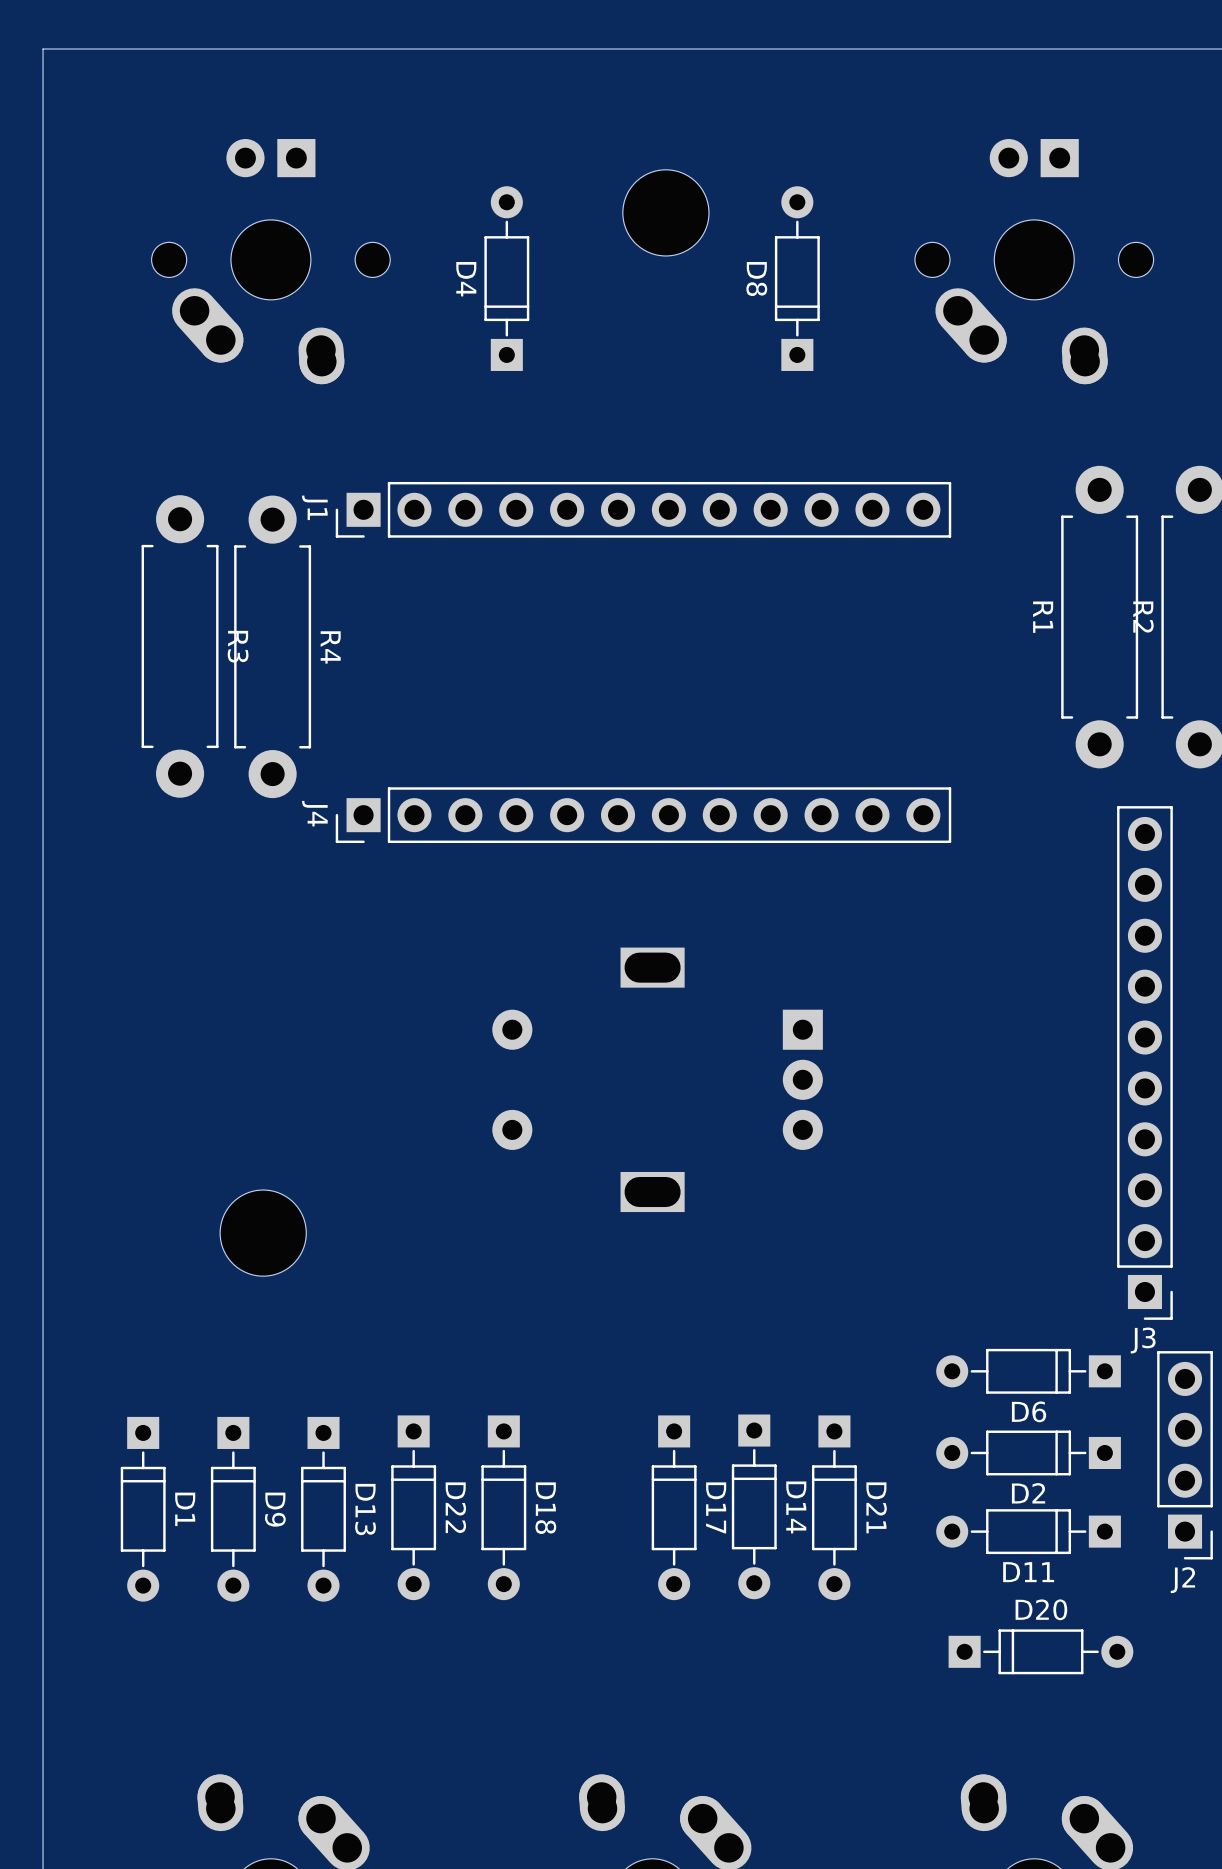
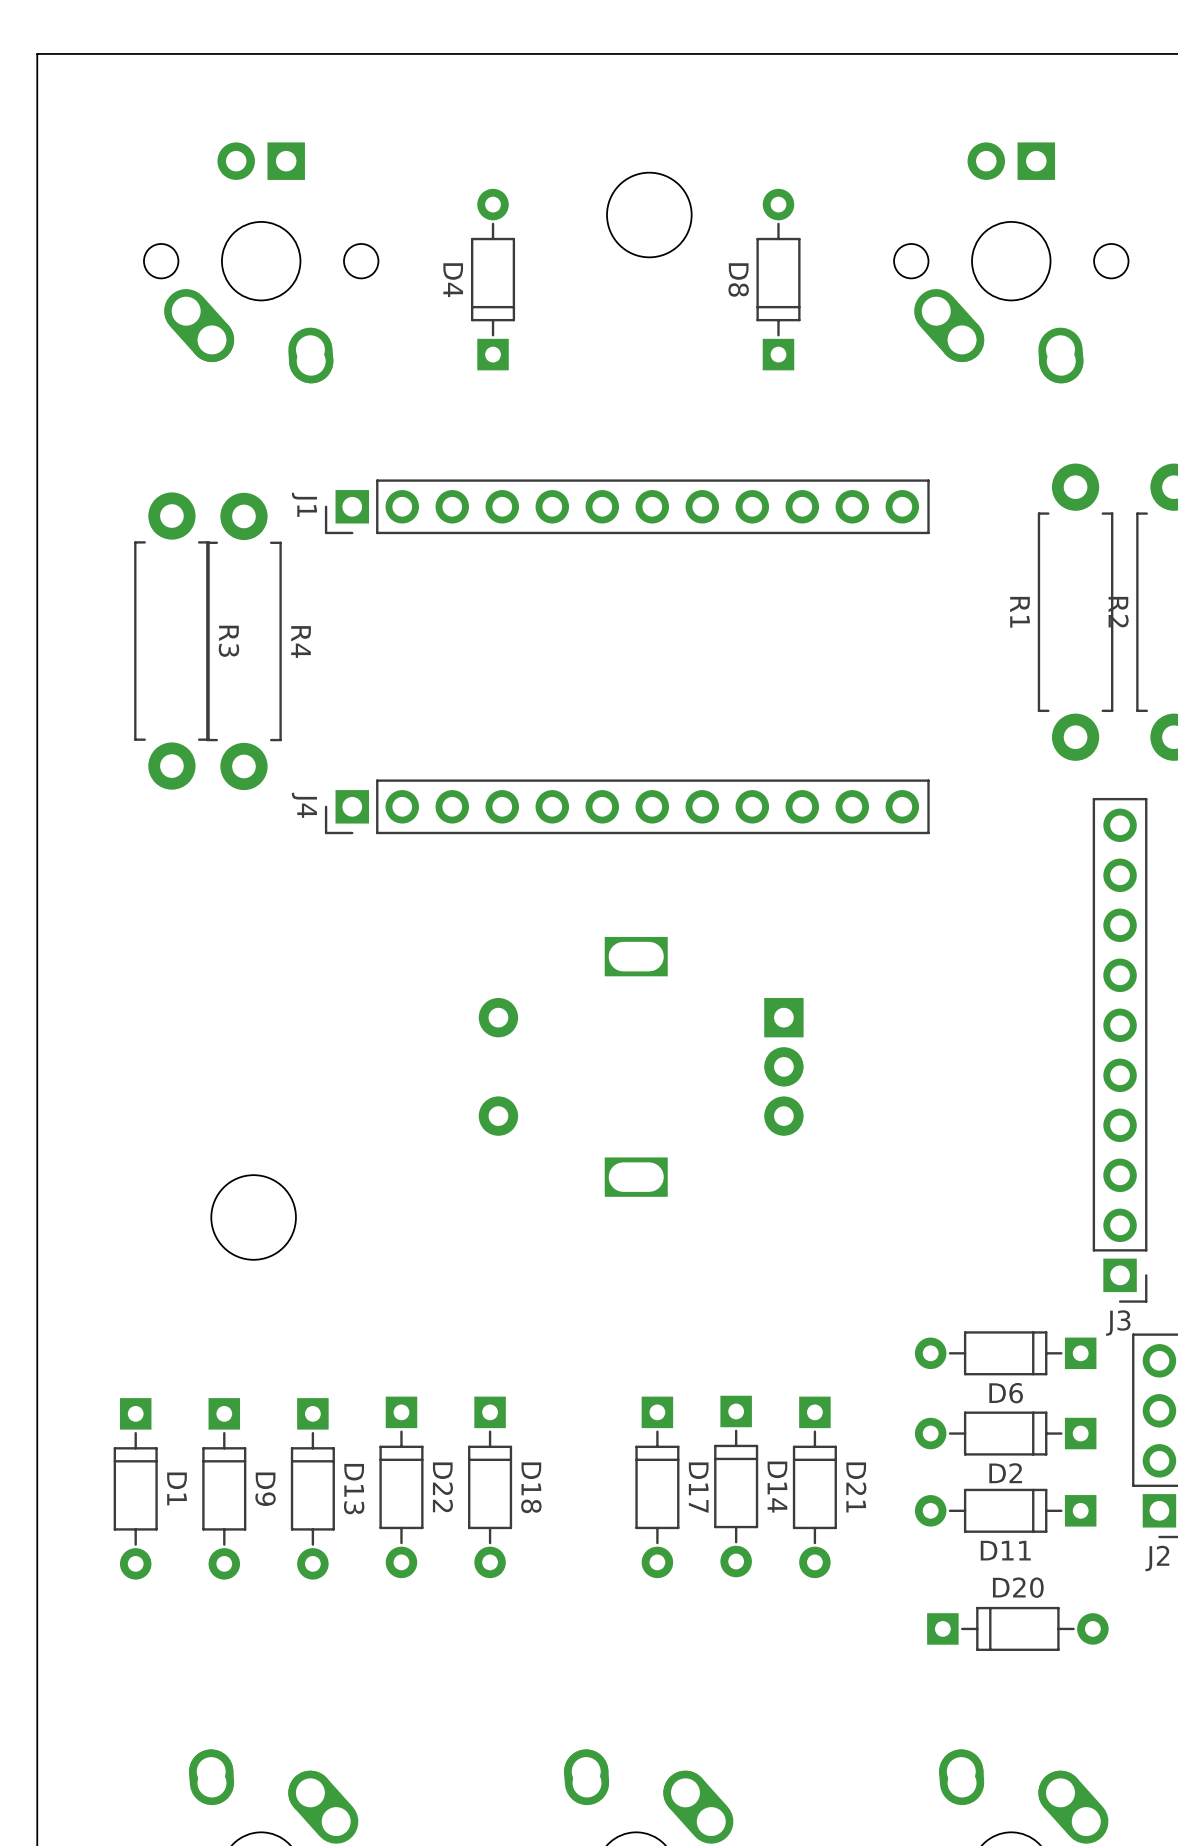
R4 position: (272, 646) -> (243, 641)

